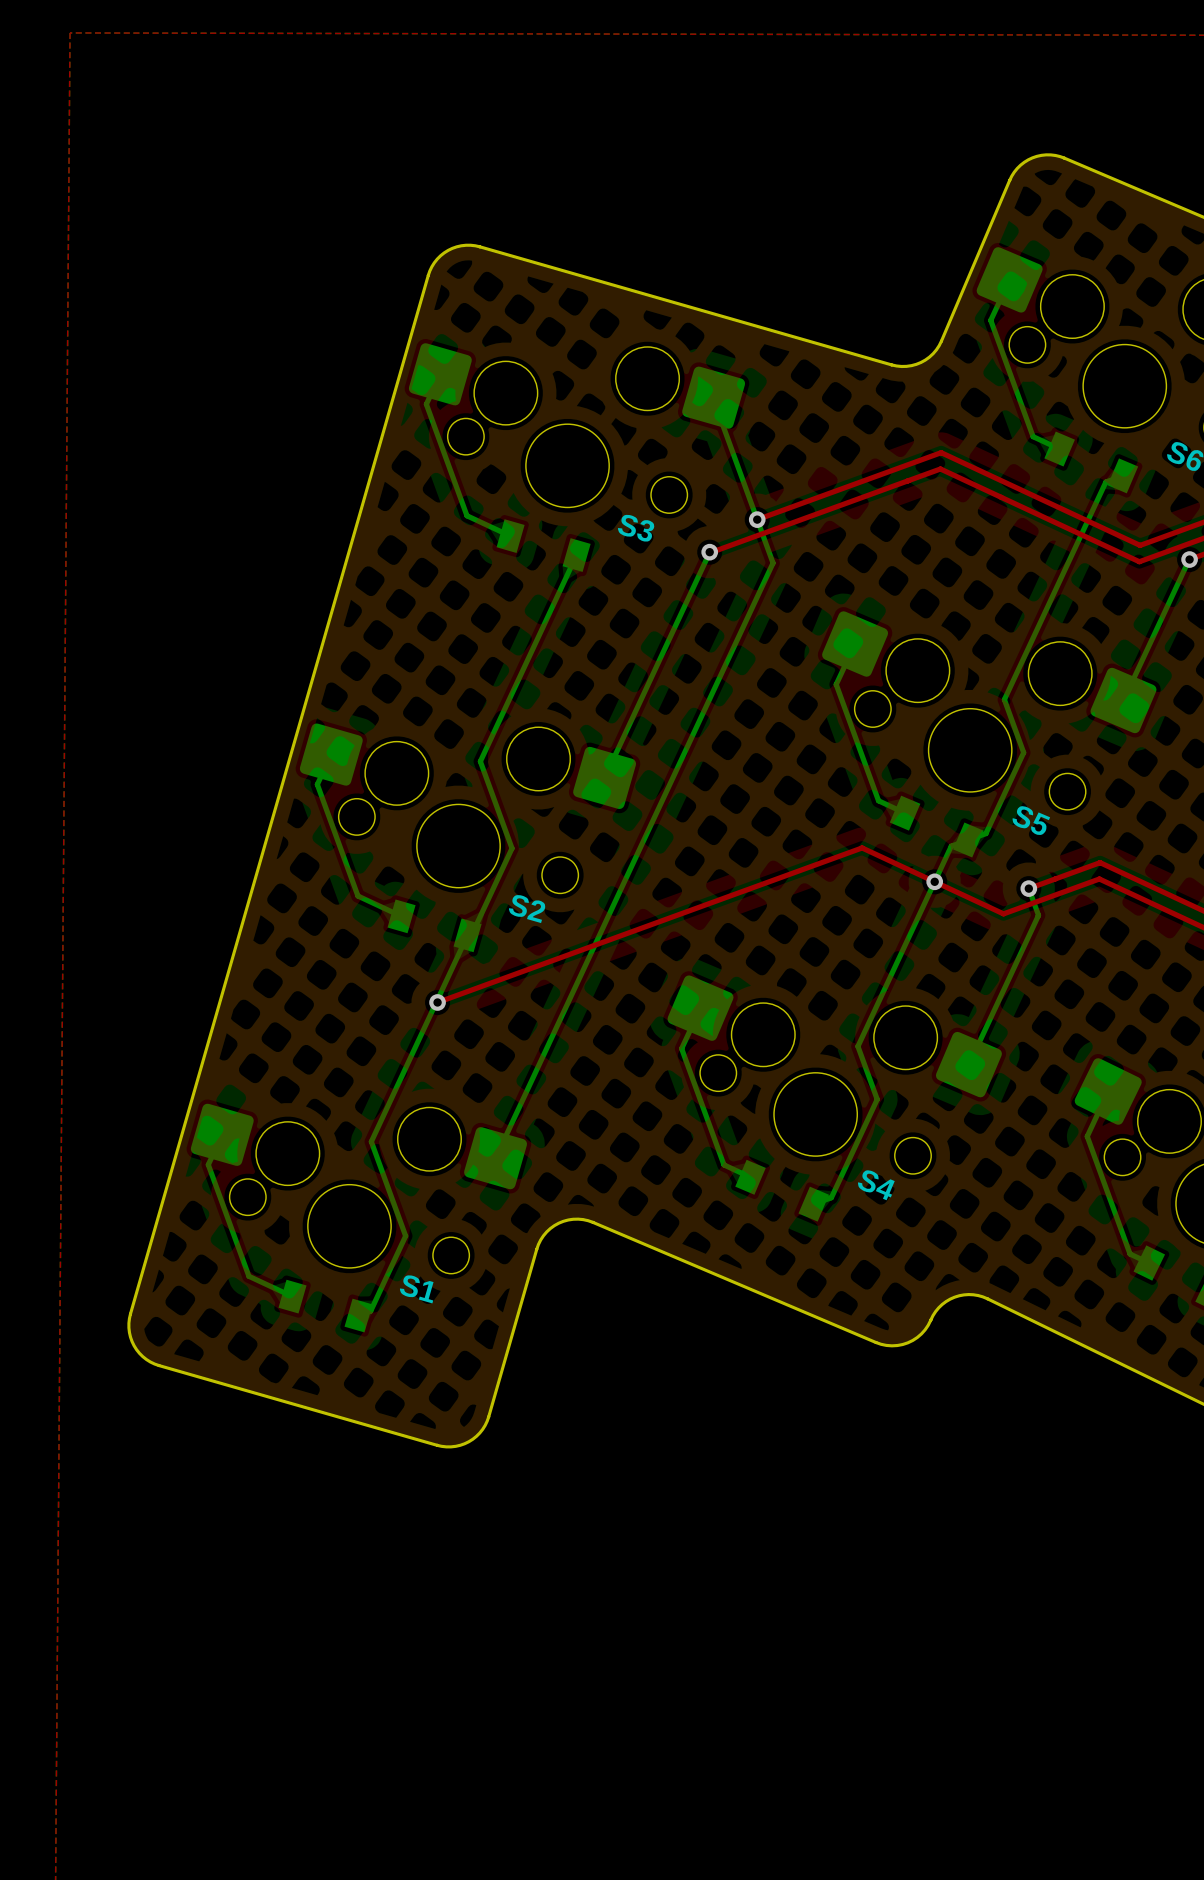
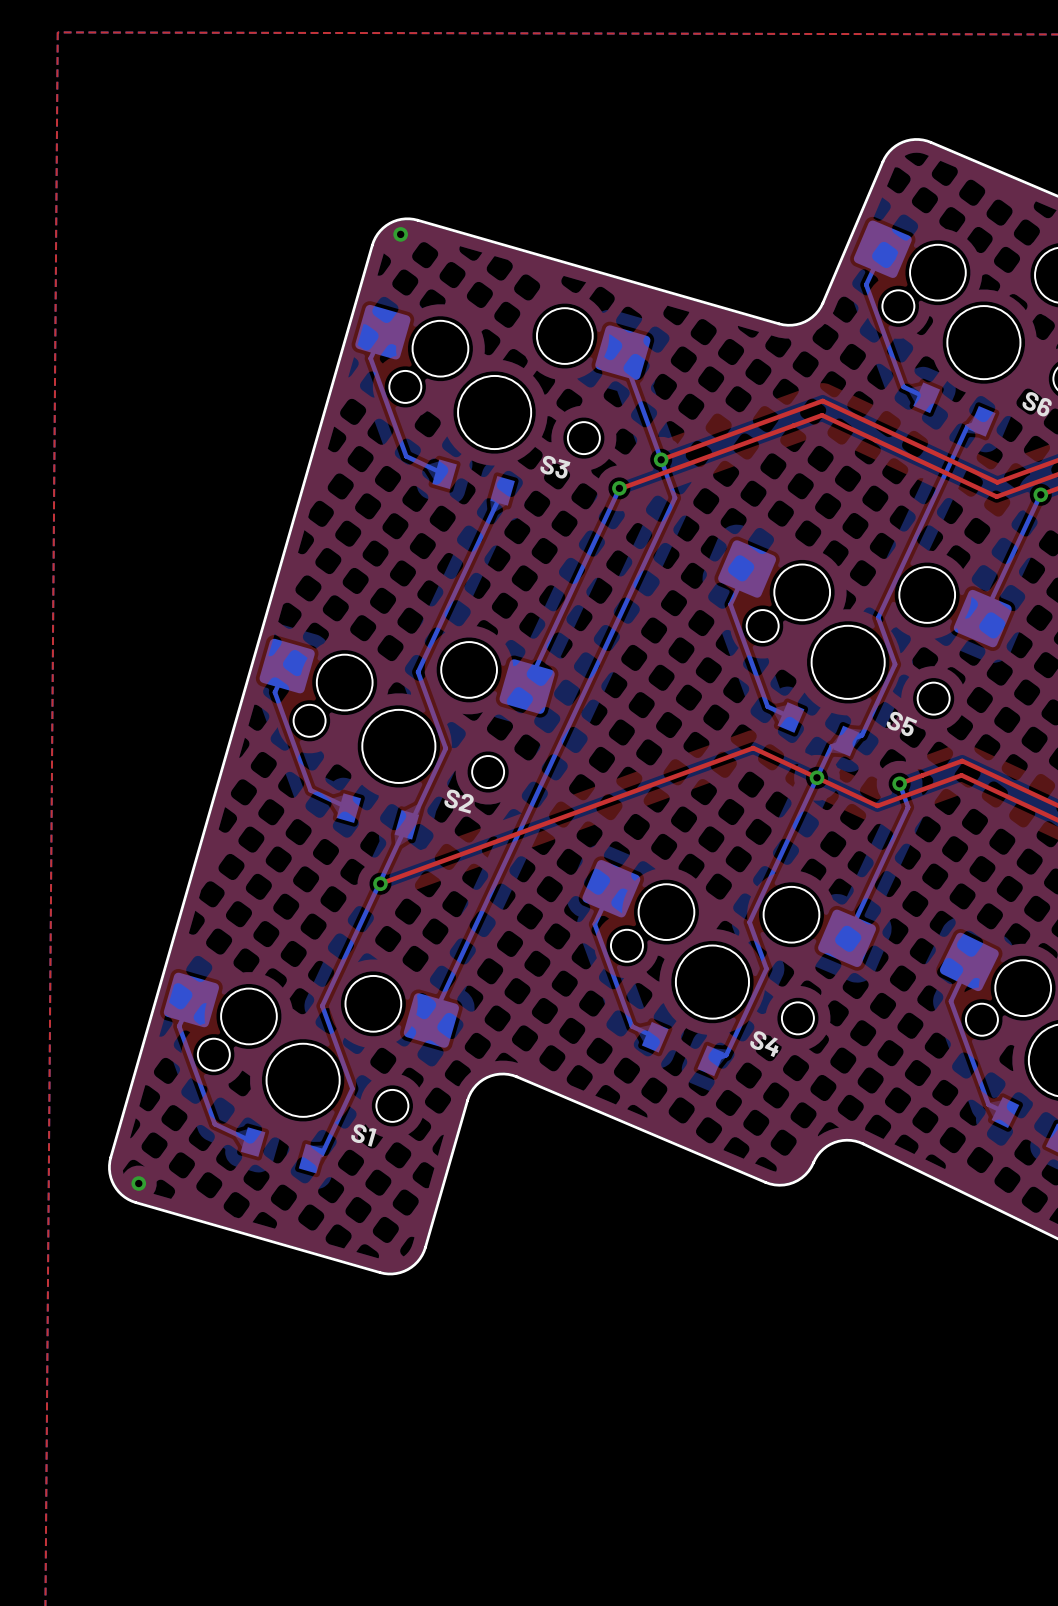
via: none -> (400, 234)
via: none -> (138, 1183)

